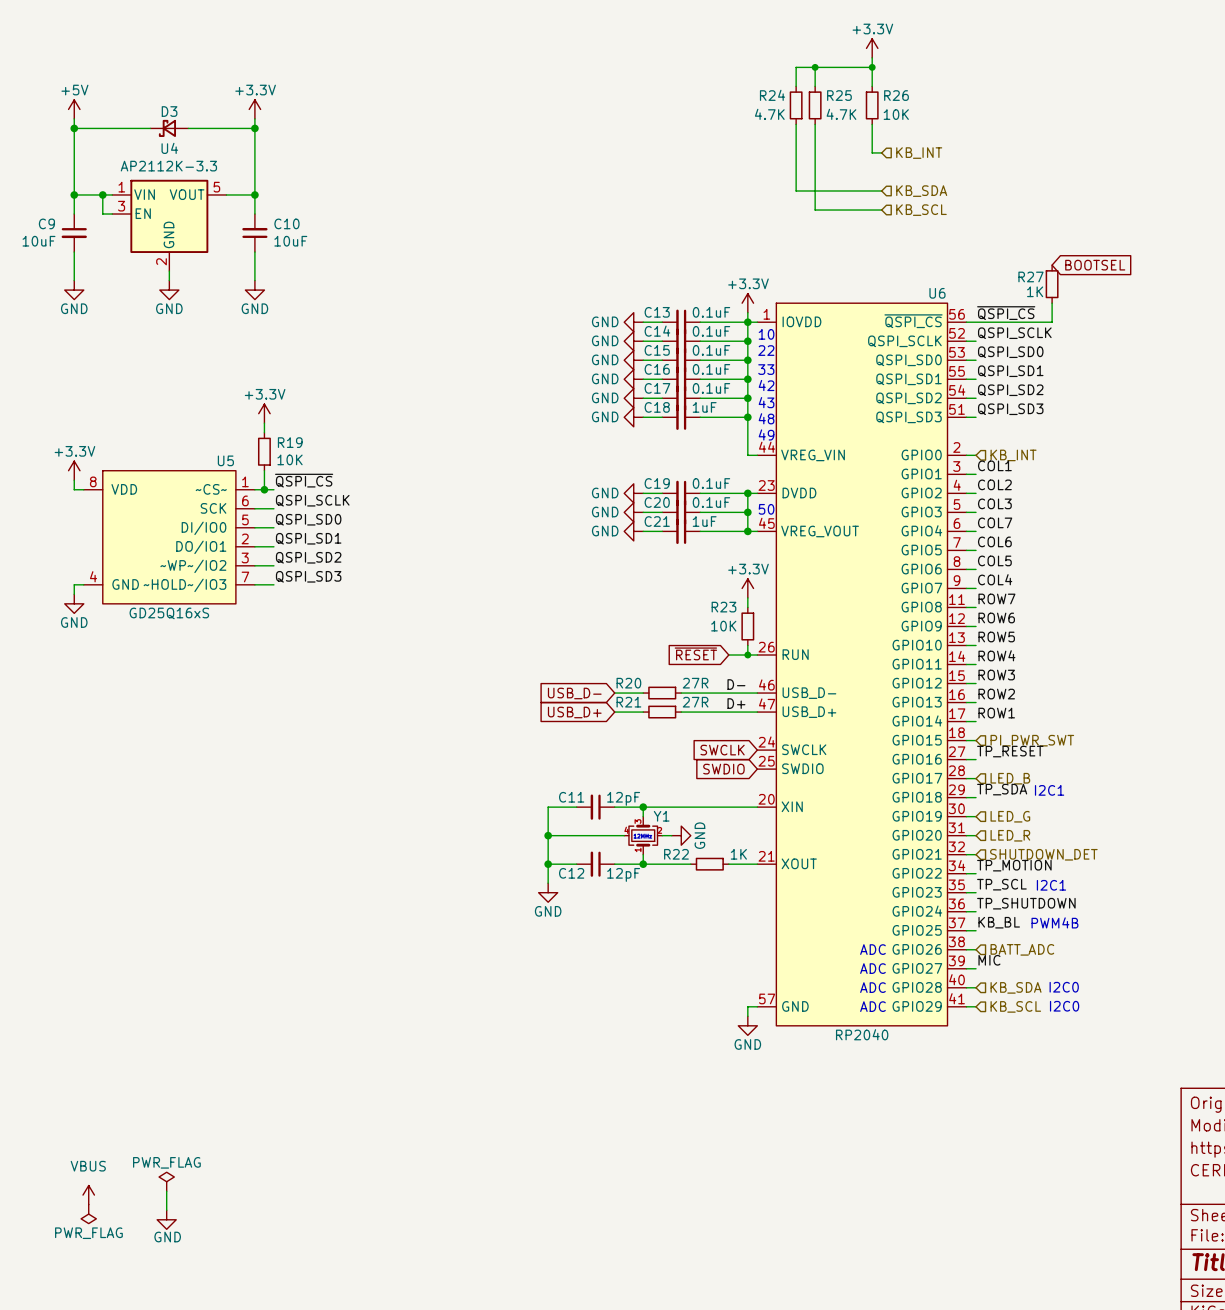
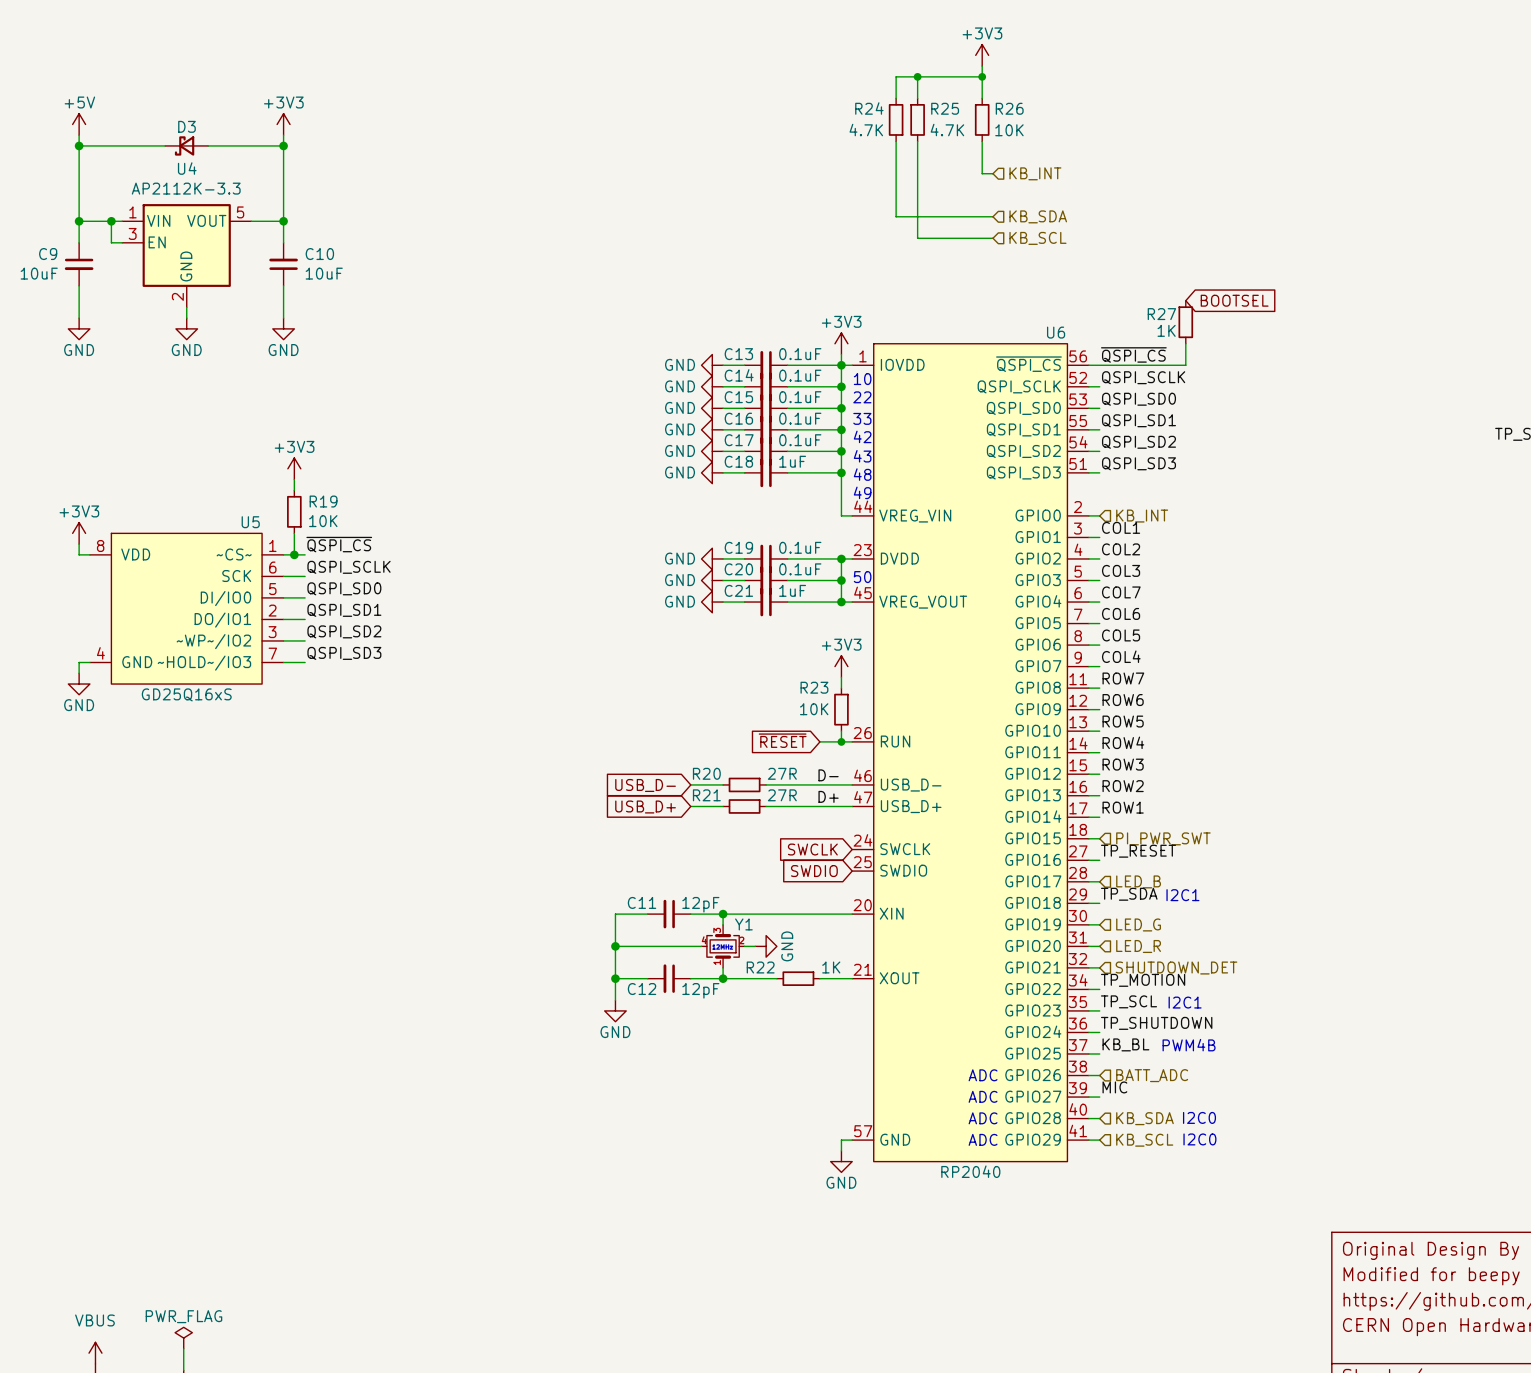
power symbol: +3.3V (872, 48) -> +3V3 (982, 55)
power symbol: +3.3V (254, 109) -> +3V3 (283, 124)
power symbol: +3.3V (747, 303) -> +3V3 (841, 343)
power symbol: +3.3V (264, 413) -> +3V3 (294, 468)
power symbol: +3.3V (74, 470) -> +3V3 (79, 533)
power symbol: +3.3V (747, 588) -> +3V3 (841, 666)

